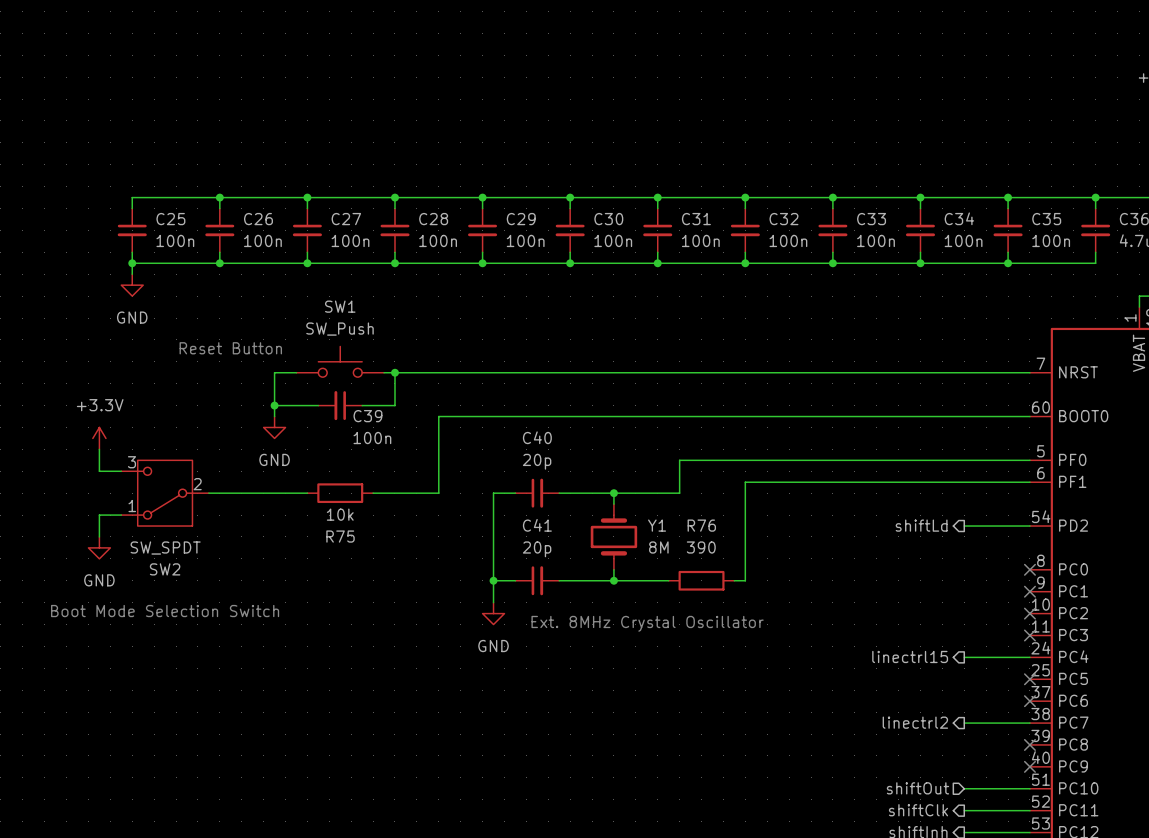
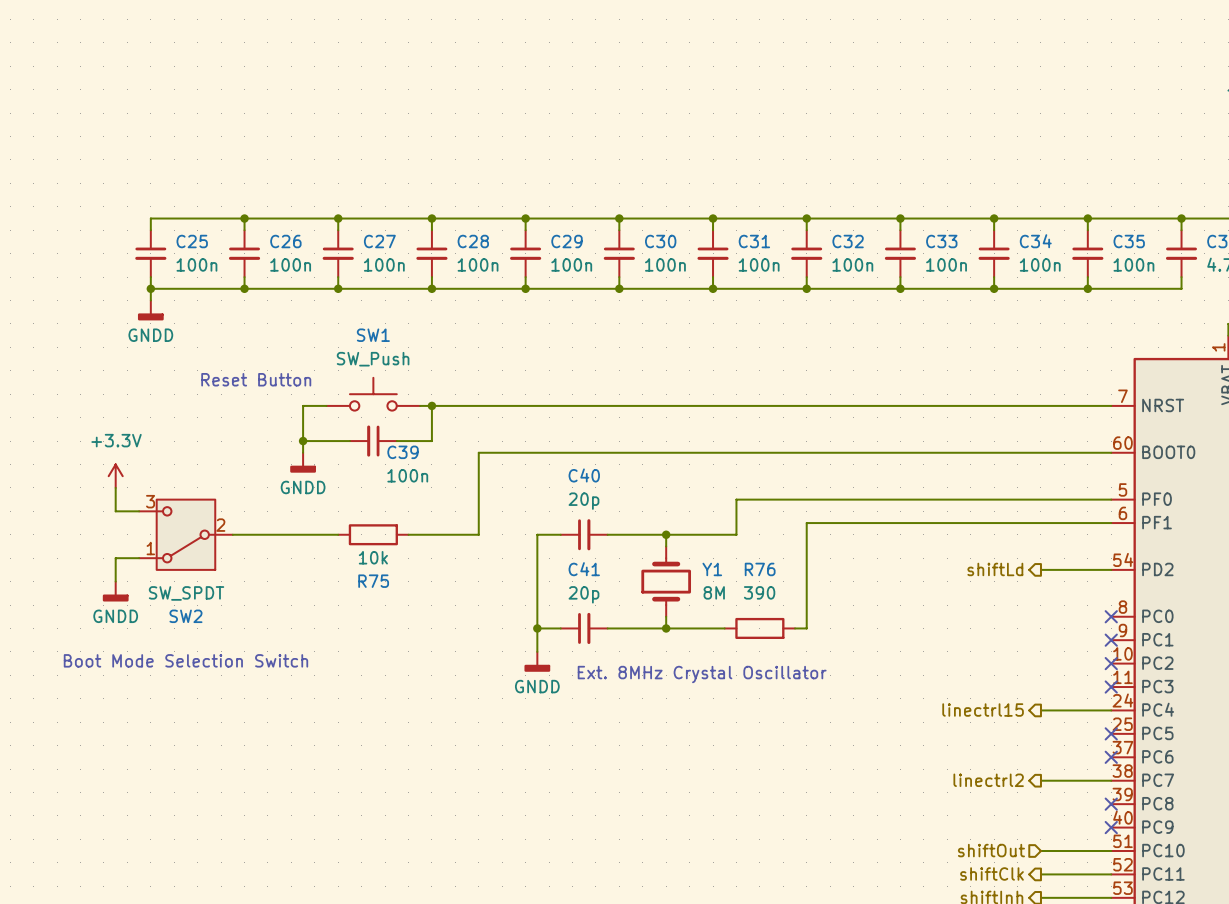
power symbol: GND (132, 285) -> GNDD (150, 310)
power symbol: GND (274, 427) -> GNDD (303, 462)
power symbol: GND (99, 547) -> GNDD (115, 591)
power symbol: GND (493, 613) -> GNDD (537, 661)

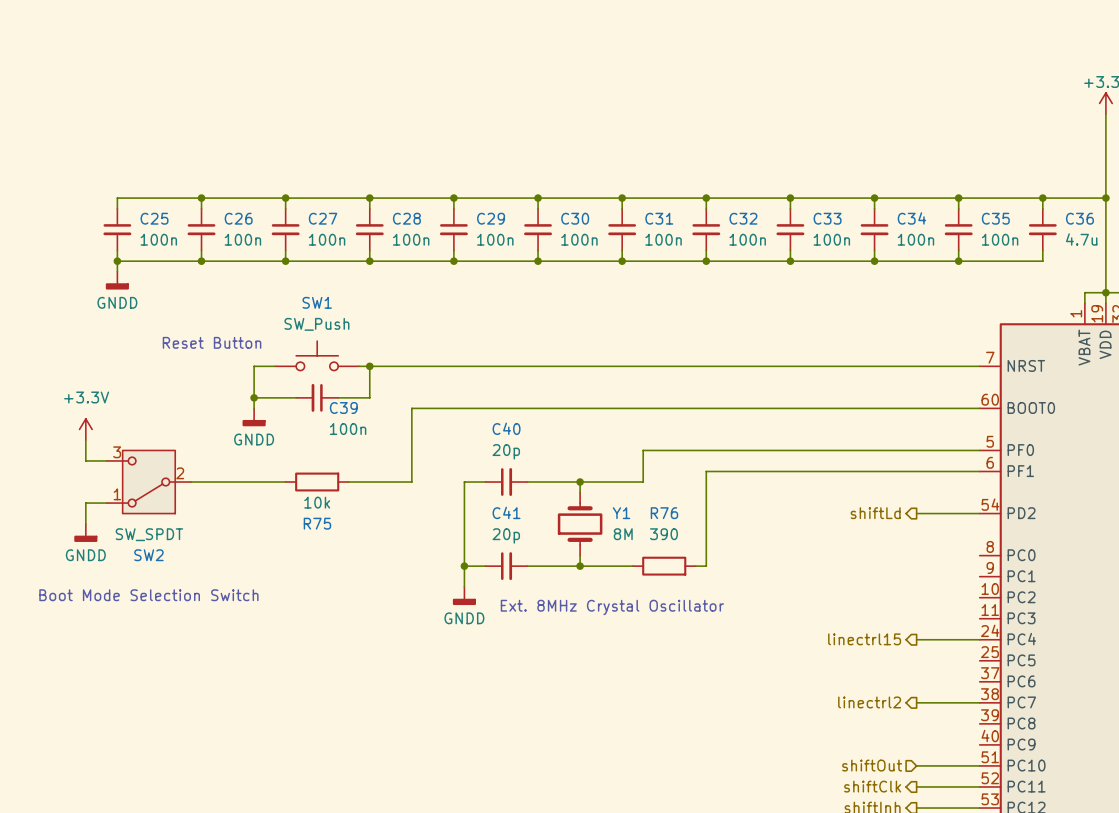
no-connect mark: (1111, 616) -> none
no-connect mark: (1111, 640) -> none
no-connect mark: (1111, 663) -> none
no-connect mark: (1111, 687) -> none
no-connect mark: (1111, 733) -> none
no-connect mark: (1111, 757) -> none
no-connect mark: (1111, 804) -> none
no-connect mark: (1111, 827) -> none

